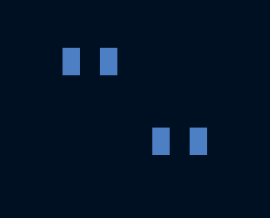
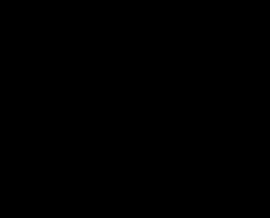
part: (89, 61) -> none
part: (179, 141) -> none

